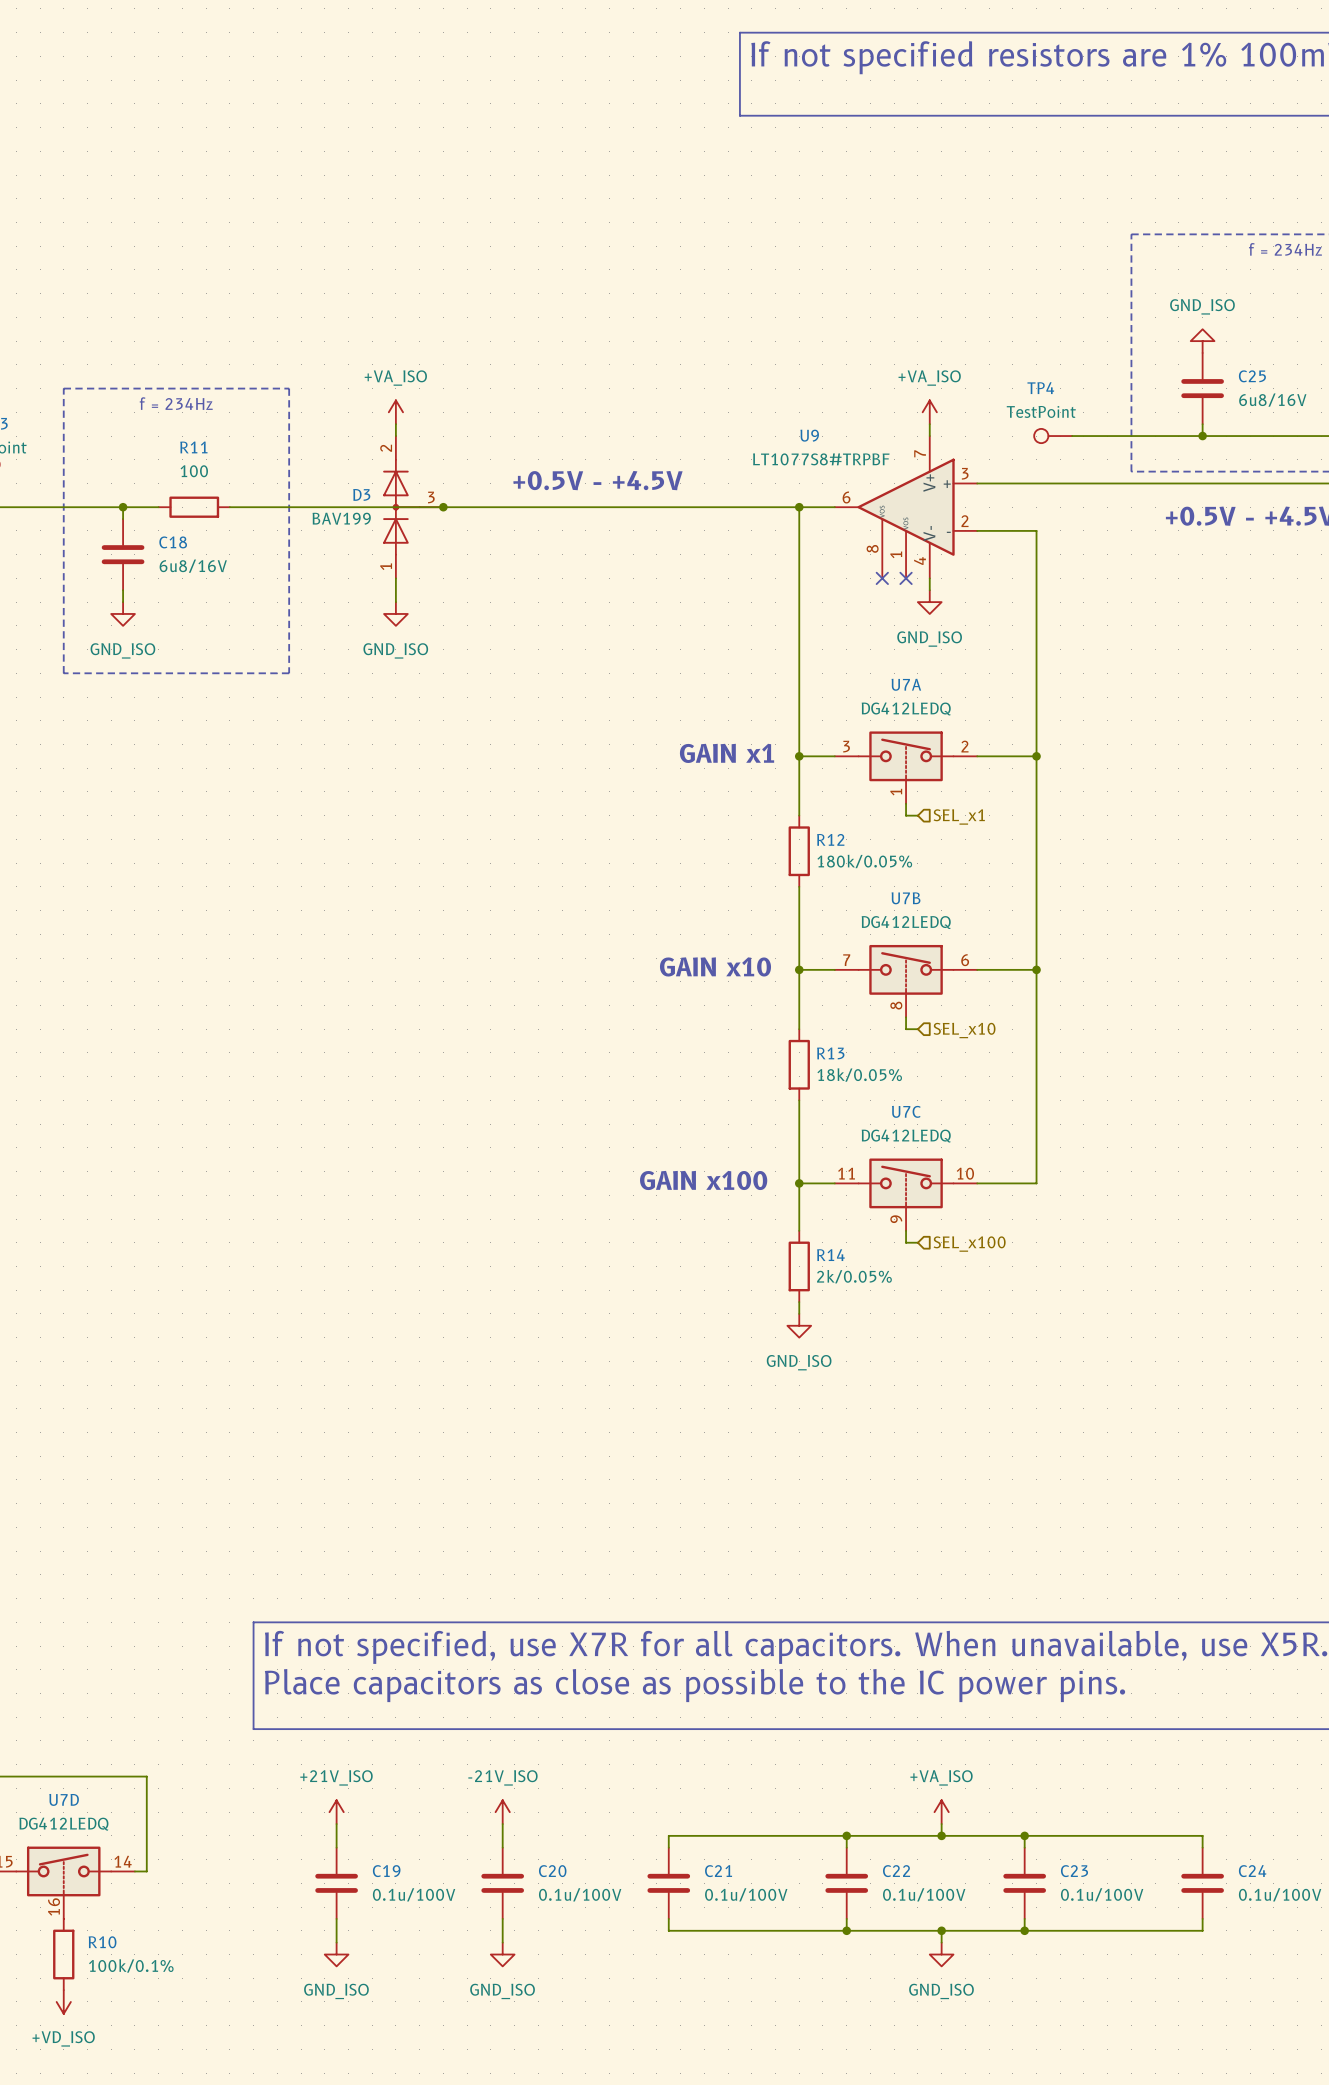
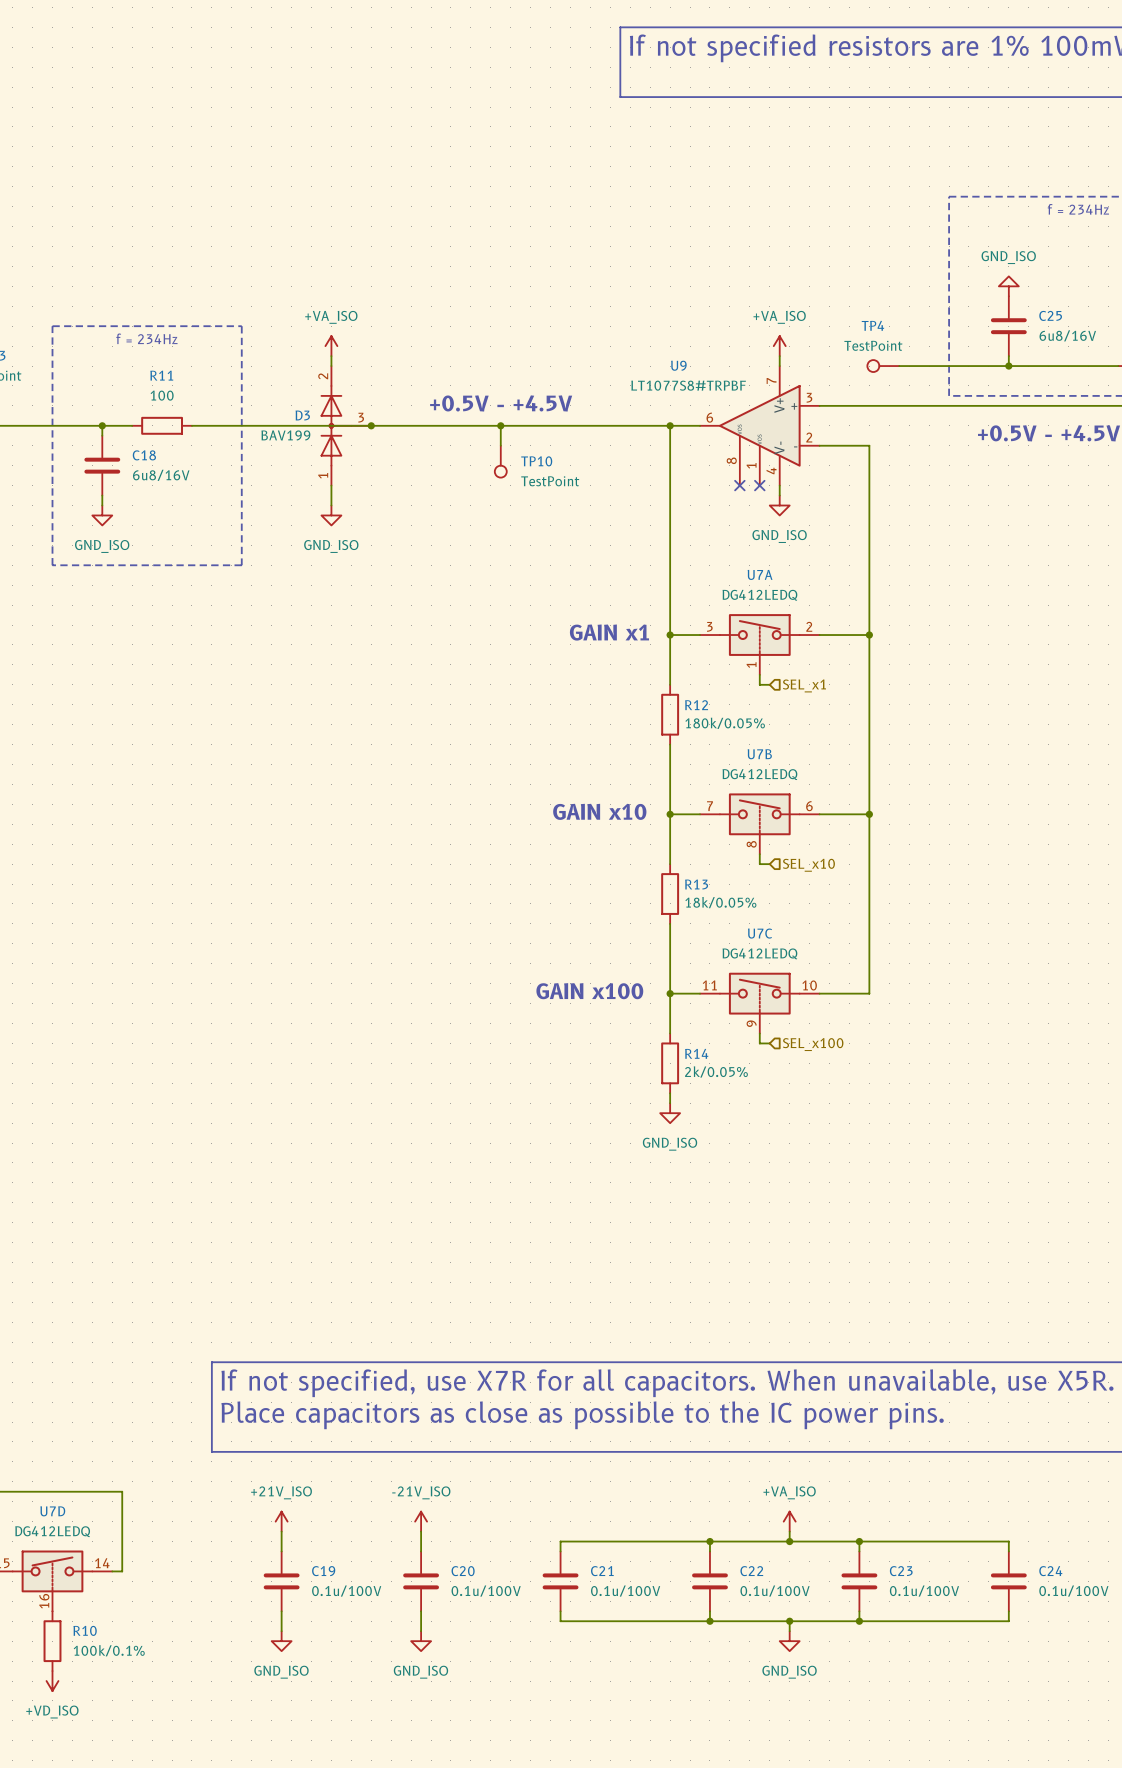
wire: none -> (500, 425) (500, 445)
junction: none -> (500, 425)
TP10: none -> TestPoint (500, 461)

